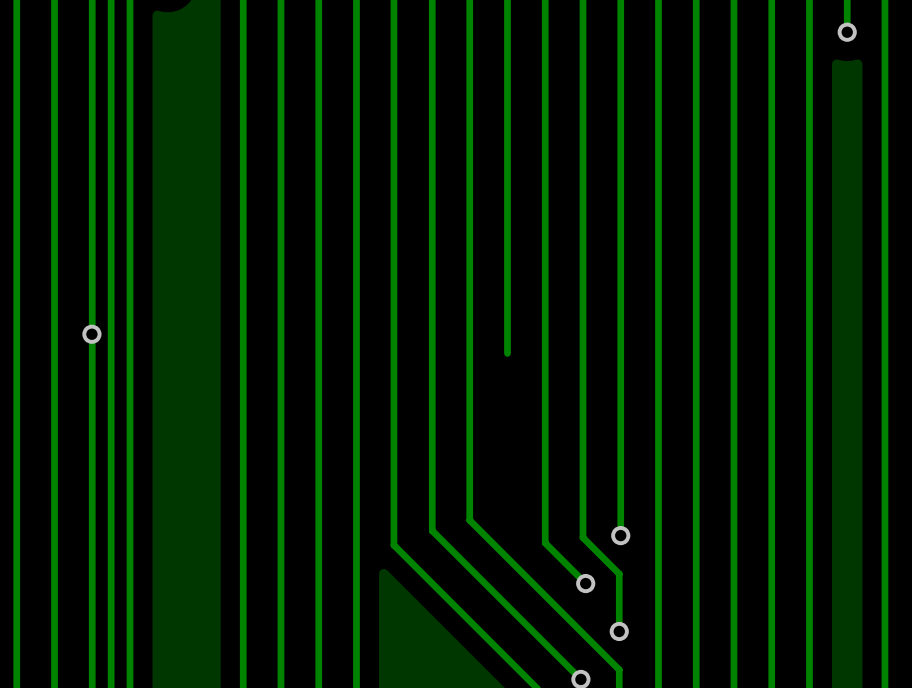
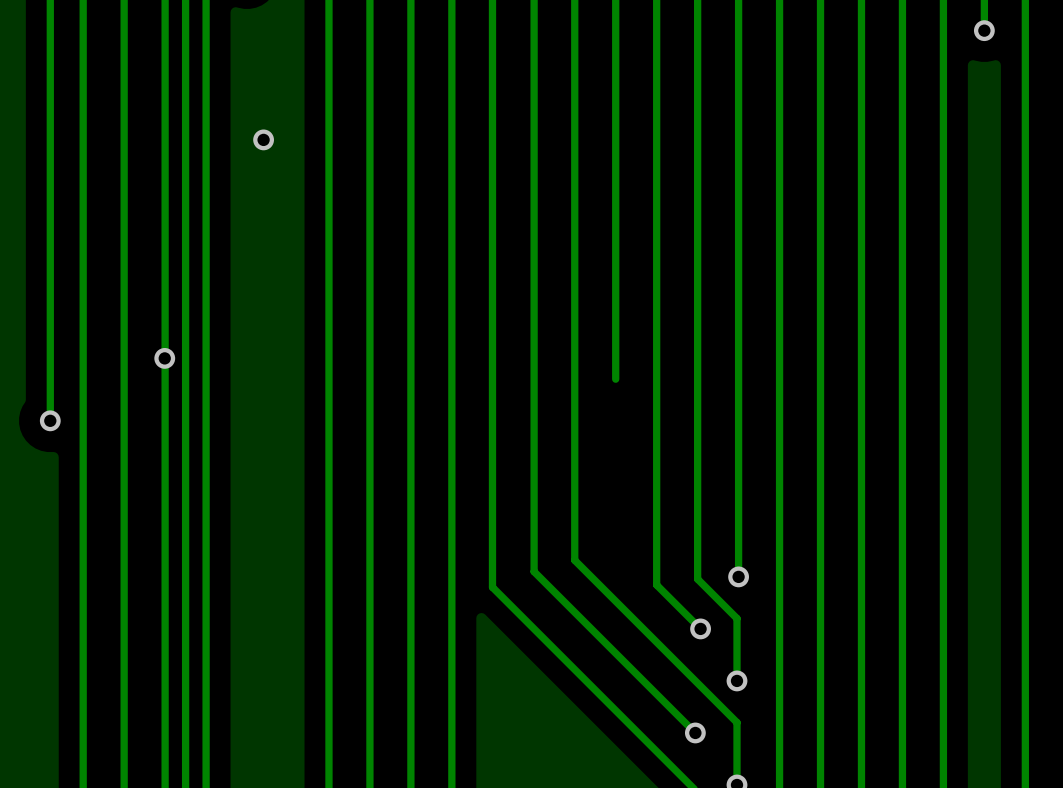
via: none -> (263, 139)

